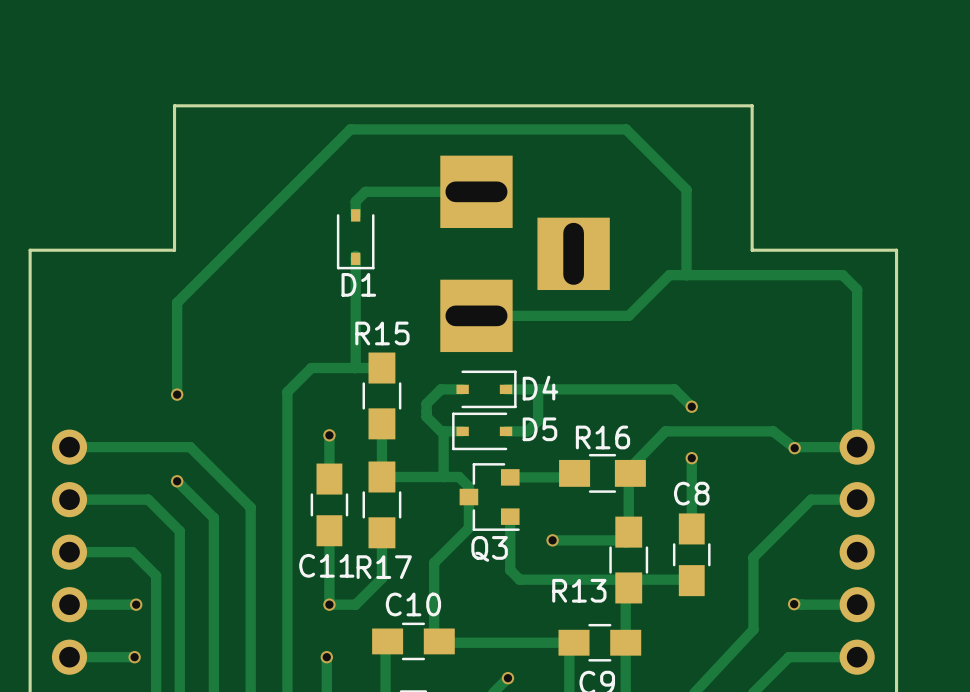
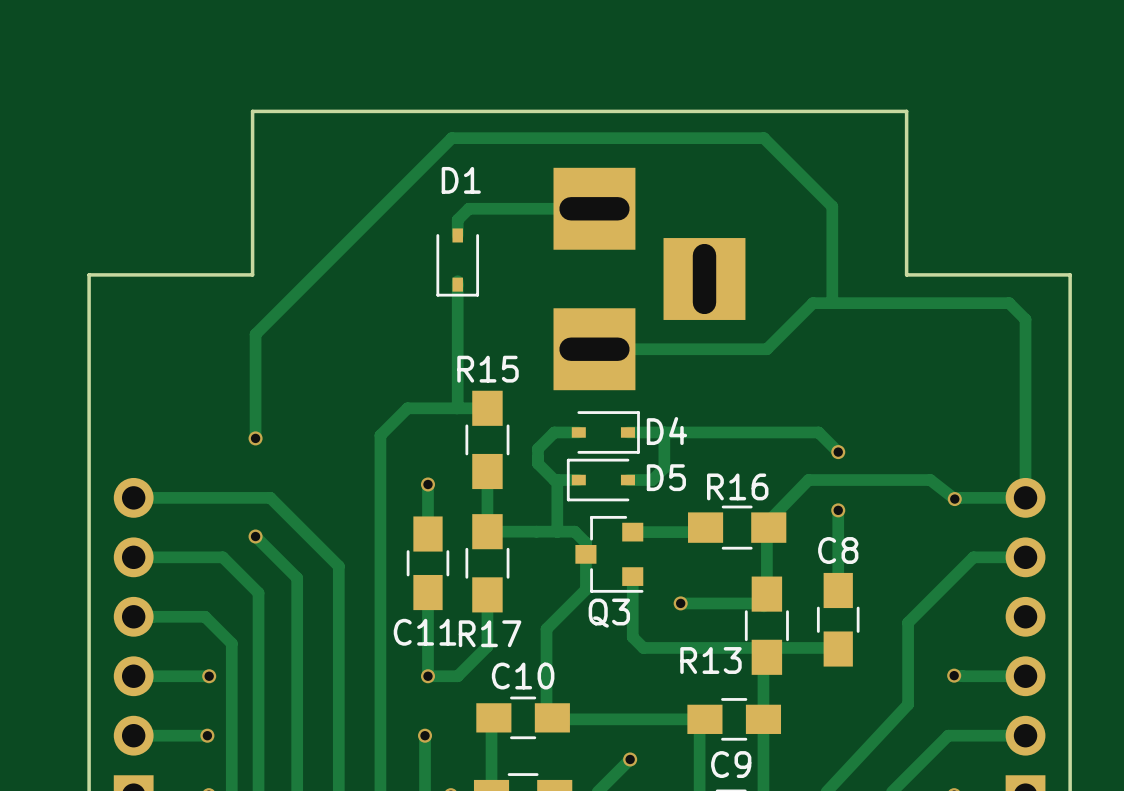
D1 name position: D1 (358, 284) -> D1 (461, 180)

